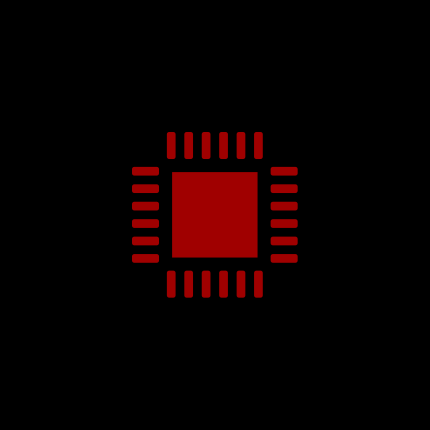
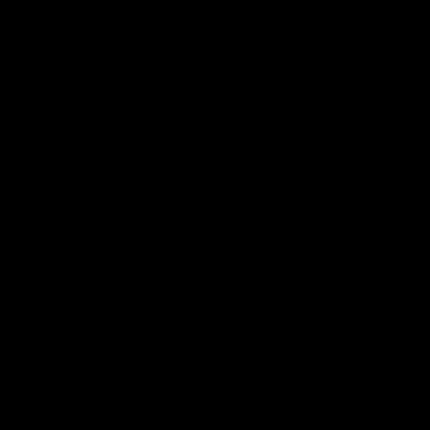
part: (214, 214) -> none

